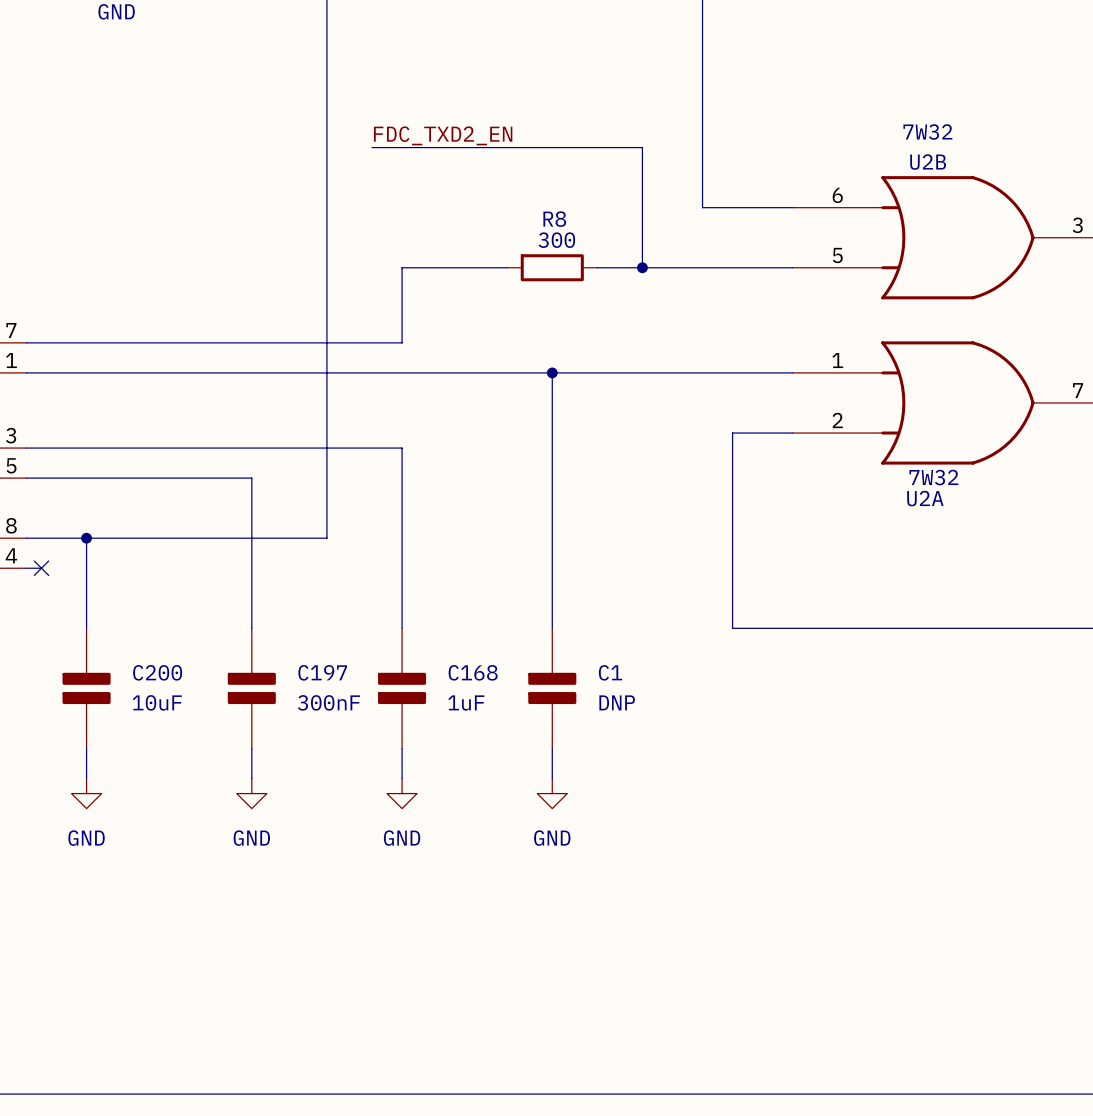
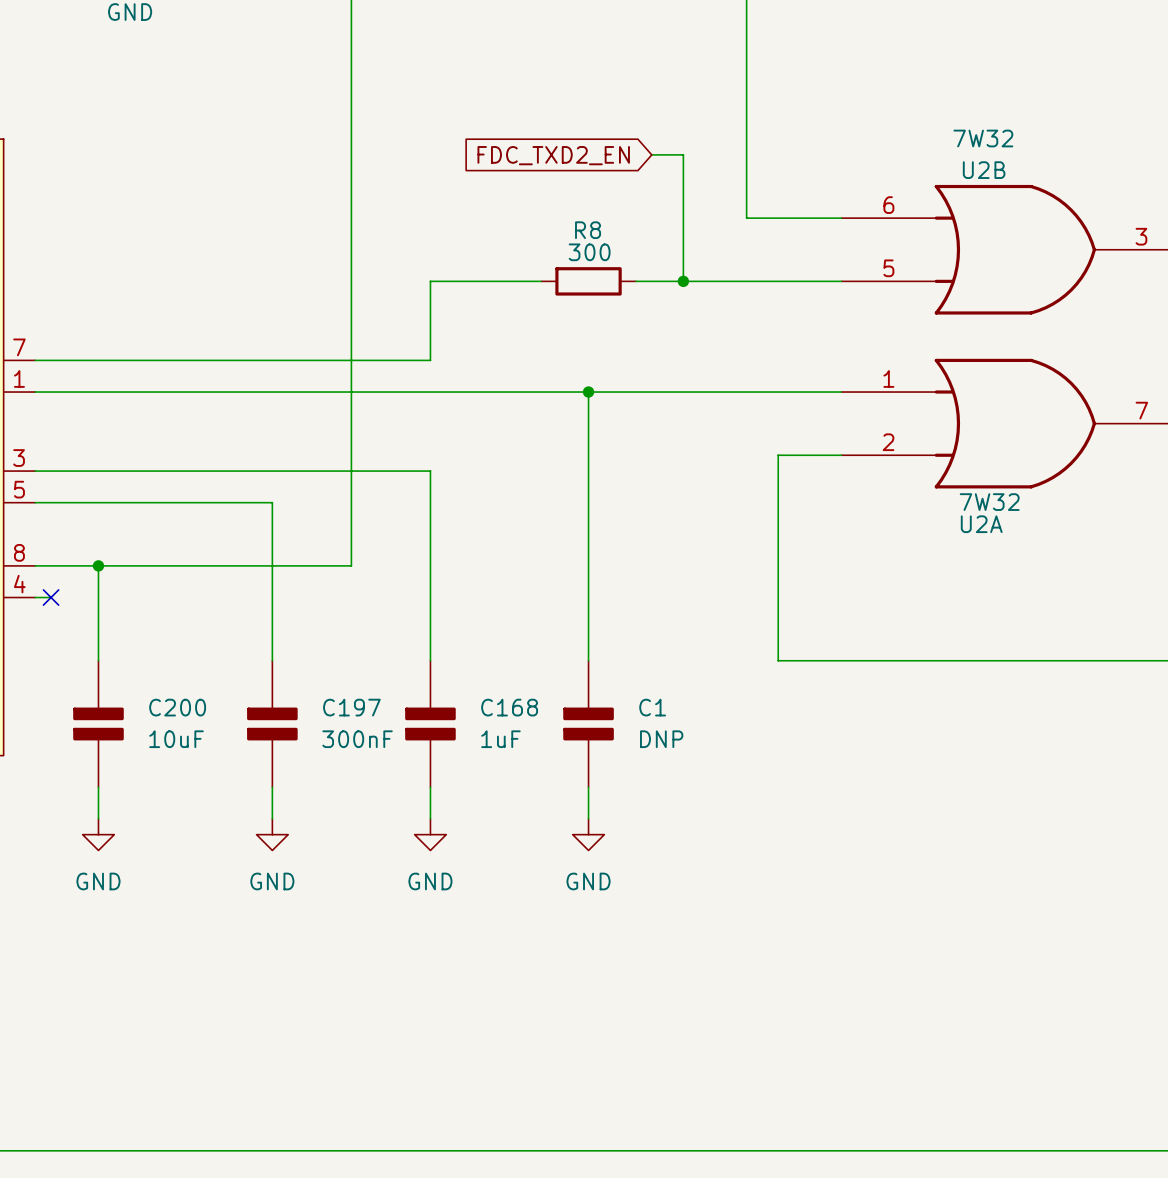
label: FDC_TXD2_EN (443, 135) -> none
wire: (372, 147) (612, 147) -> none
global label: none -> FDC_TXD2_EN (553, 155)

